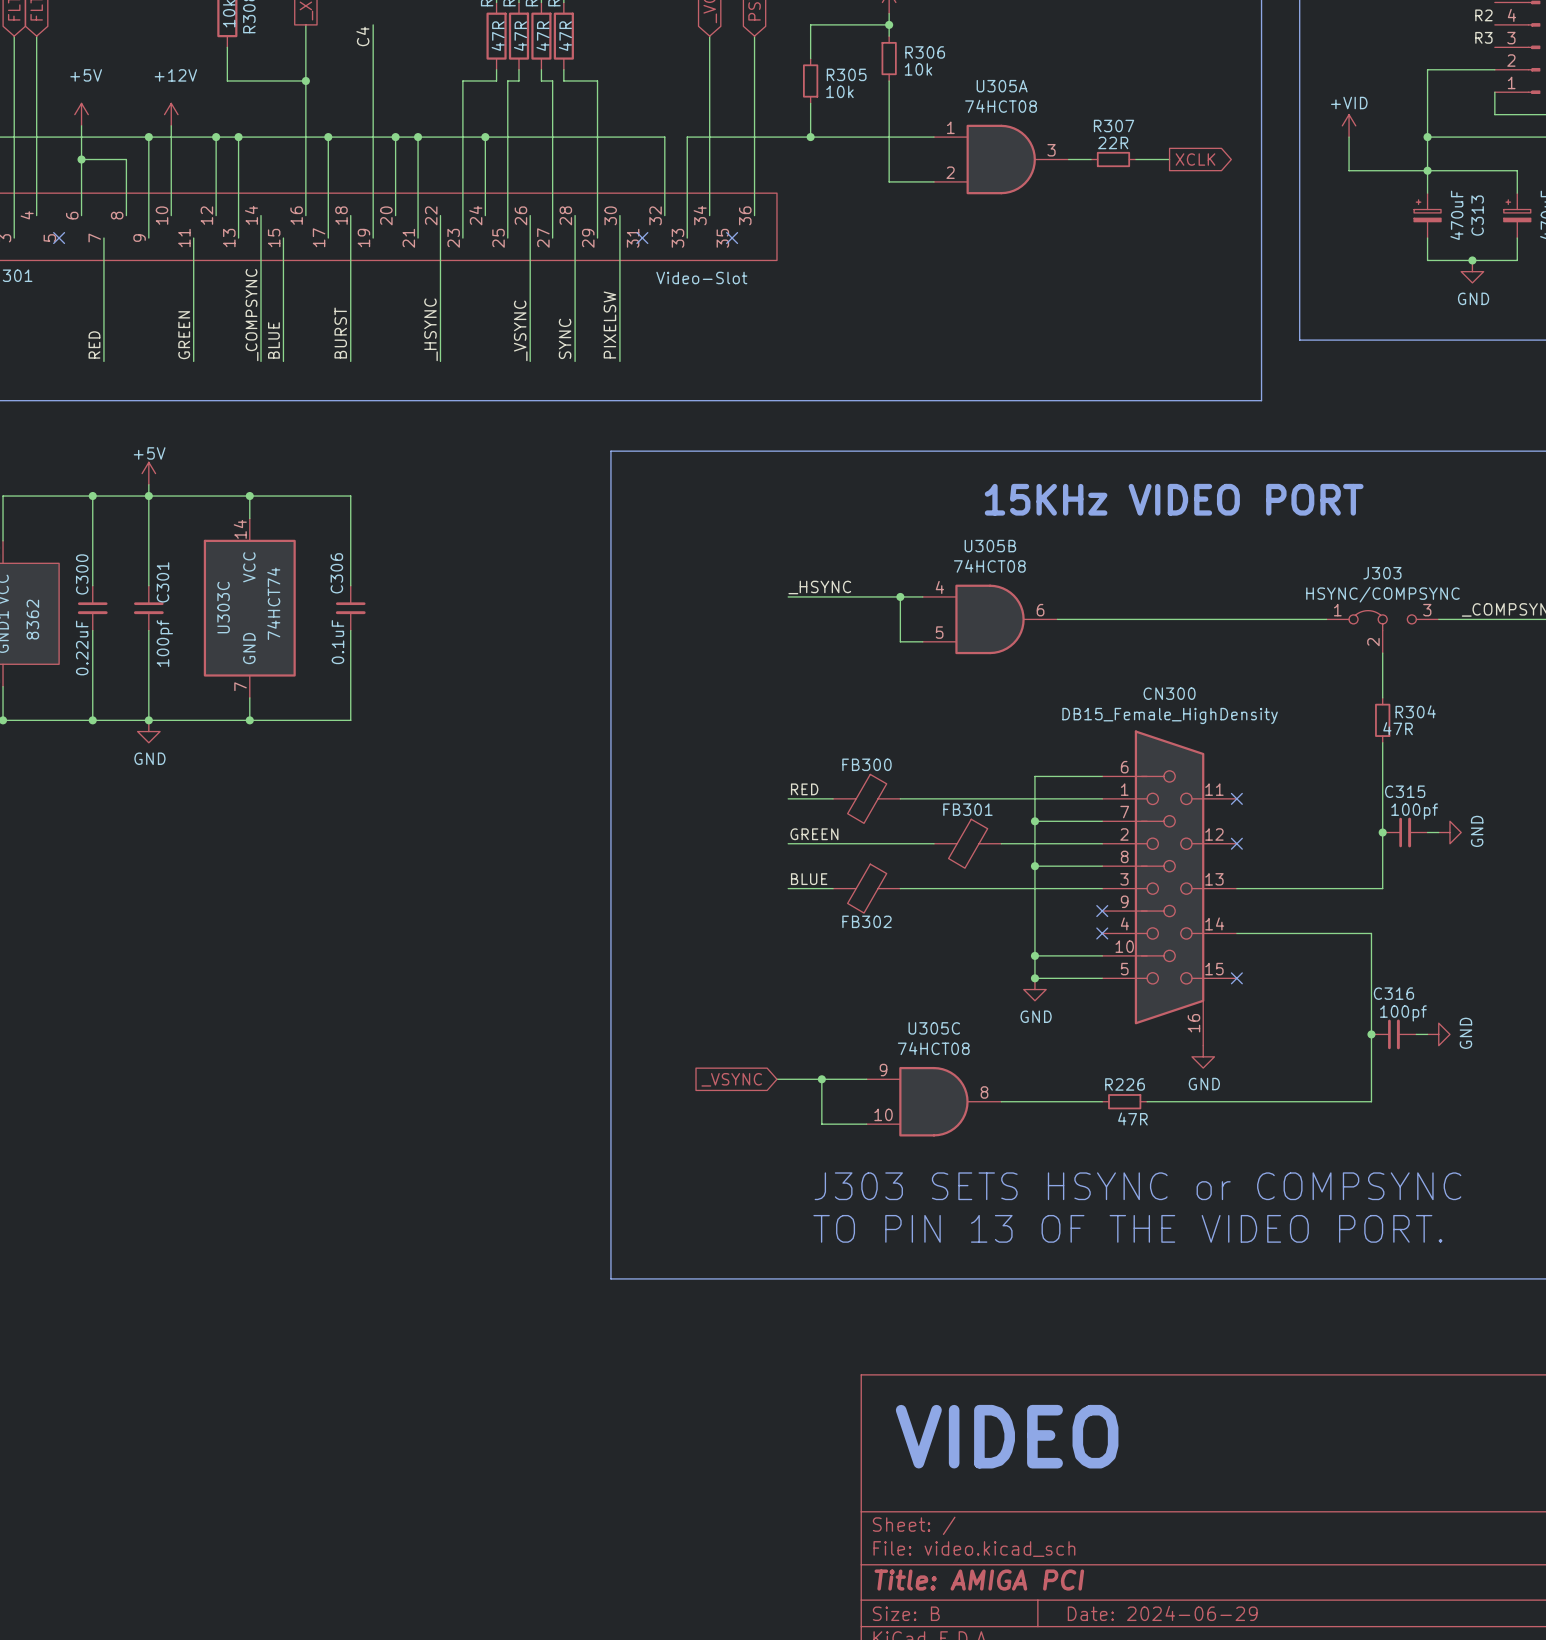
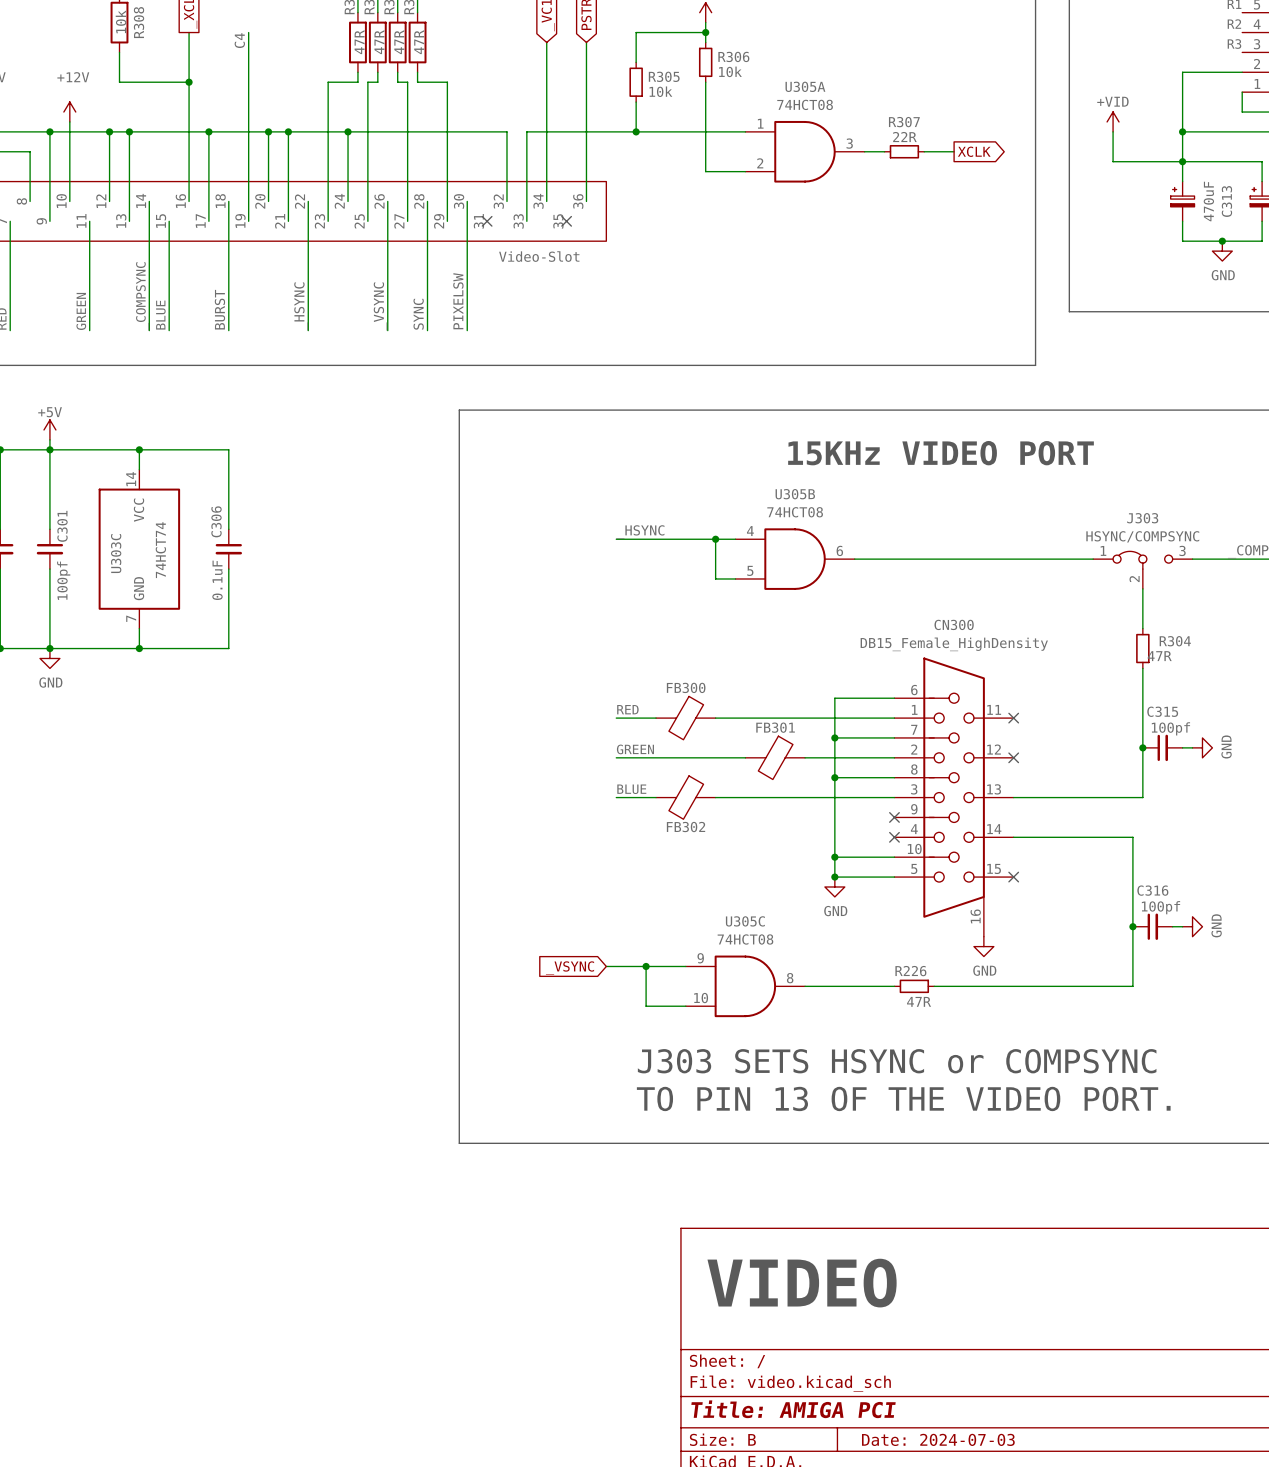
title block: Date: 2024-06-29 (1162, 1613) -> Date: 2024-07-03 (938, 1439)

